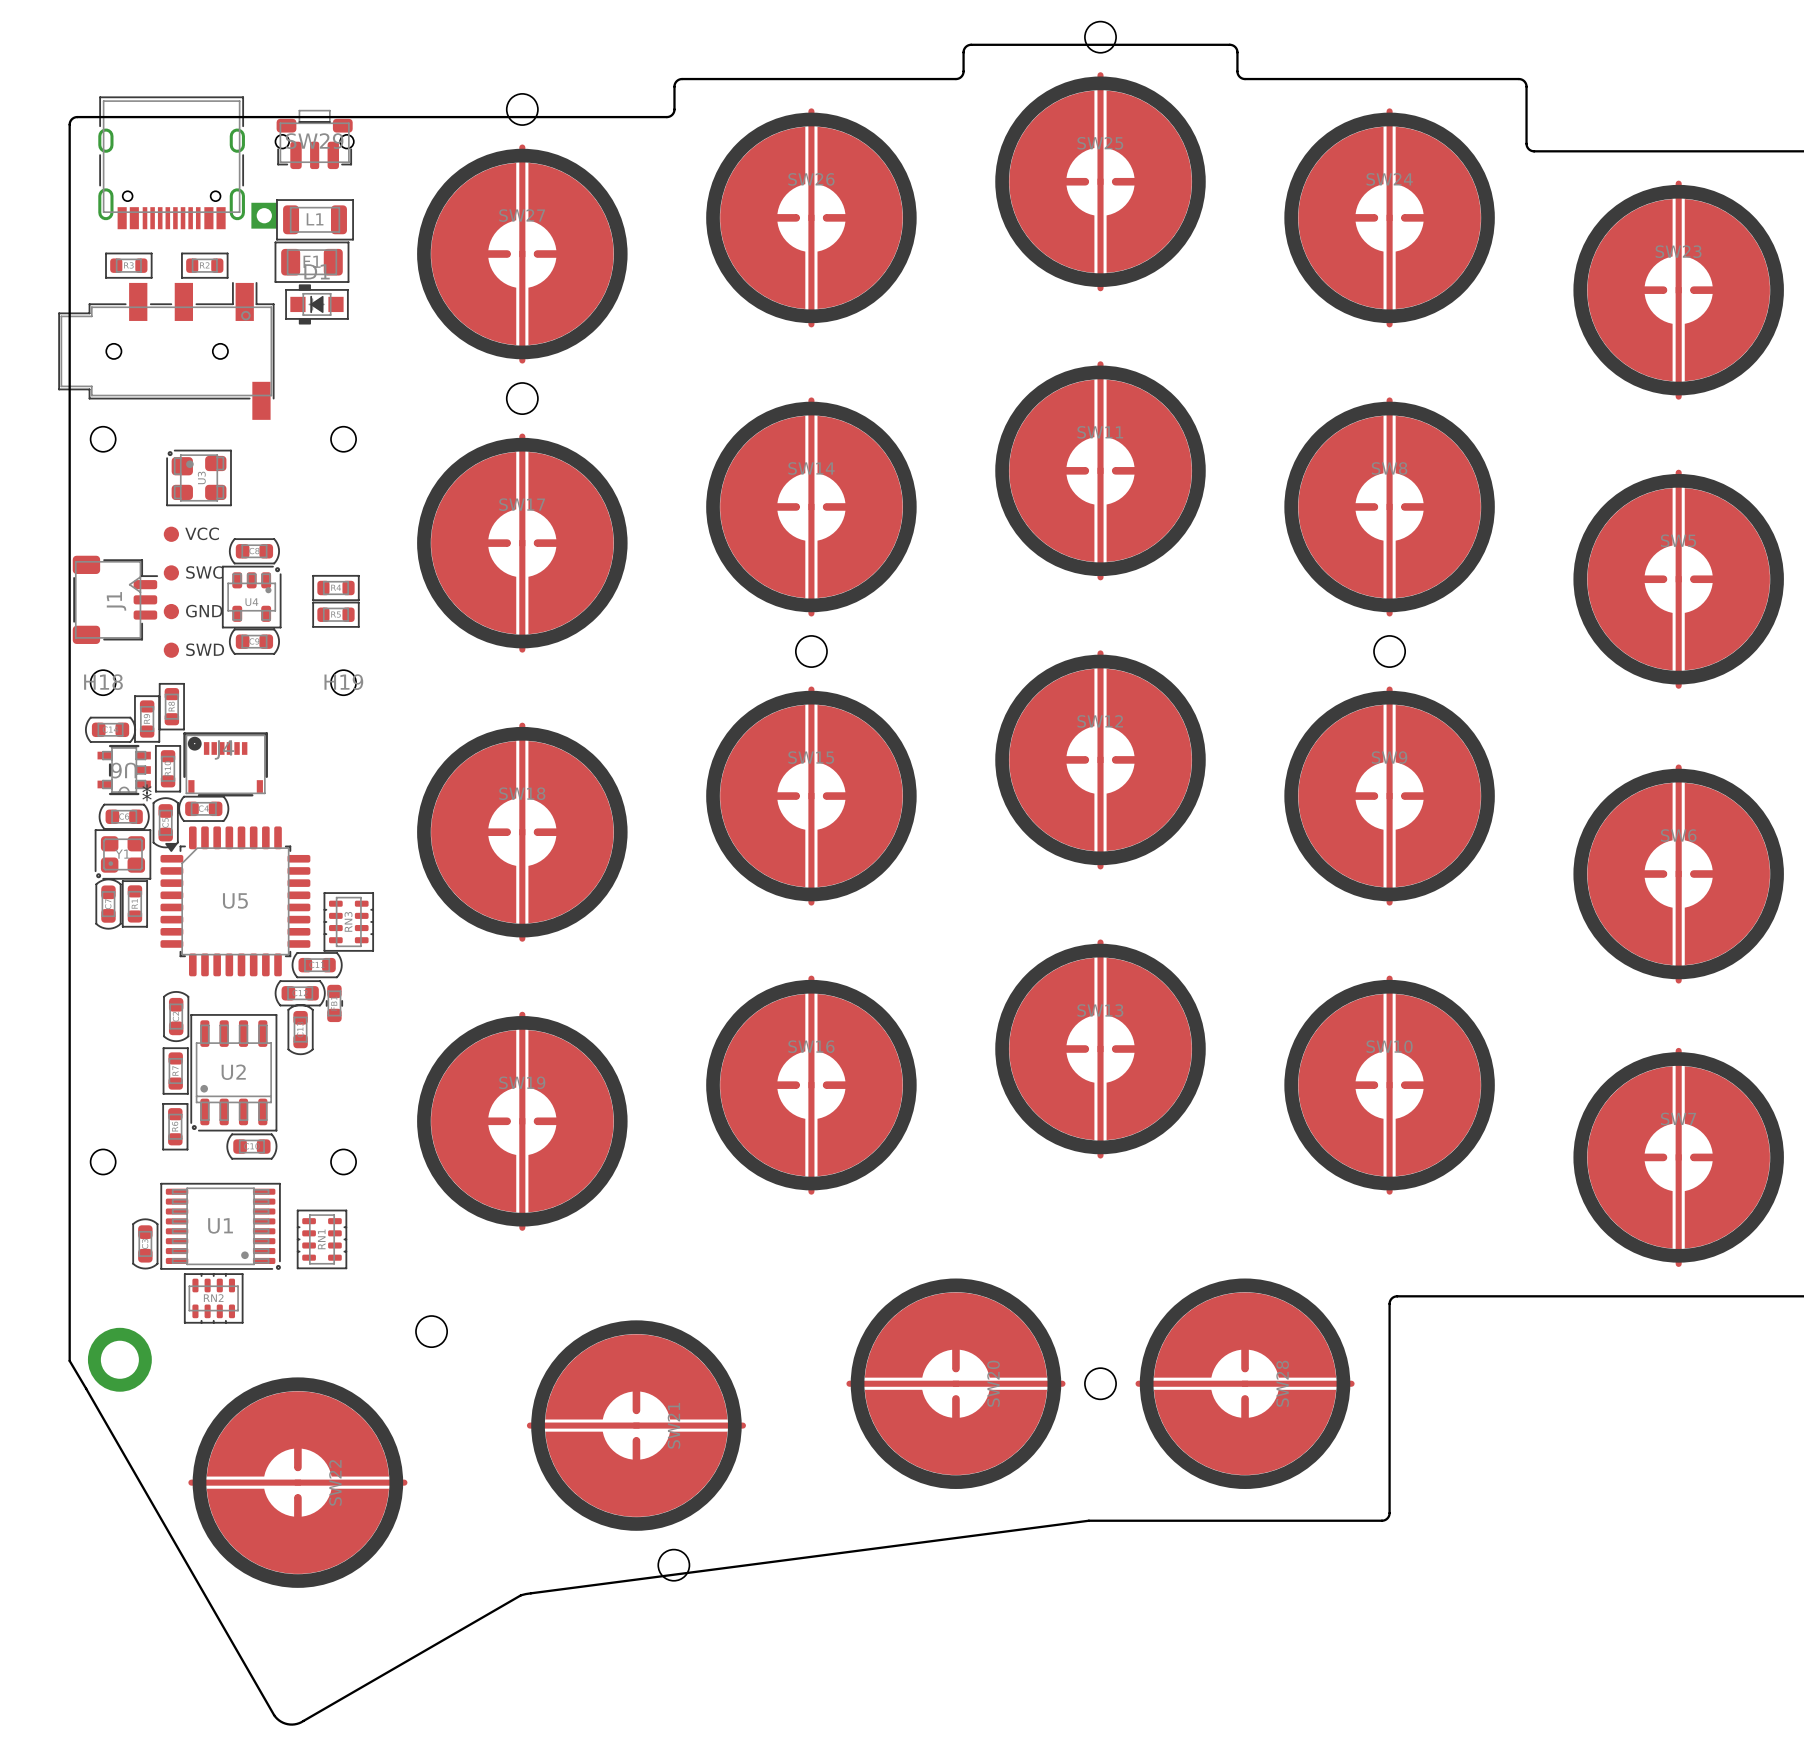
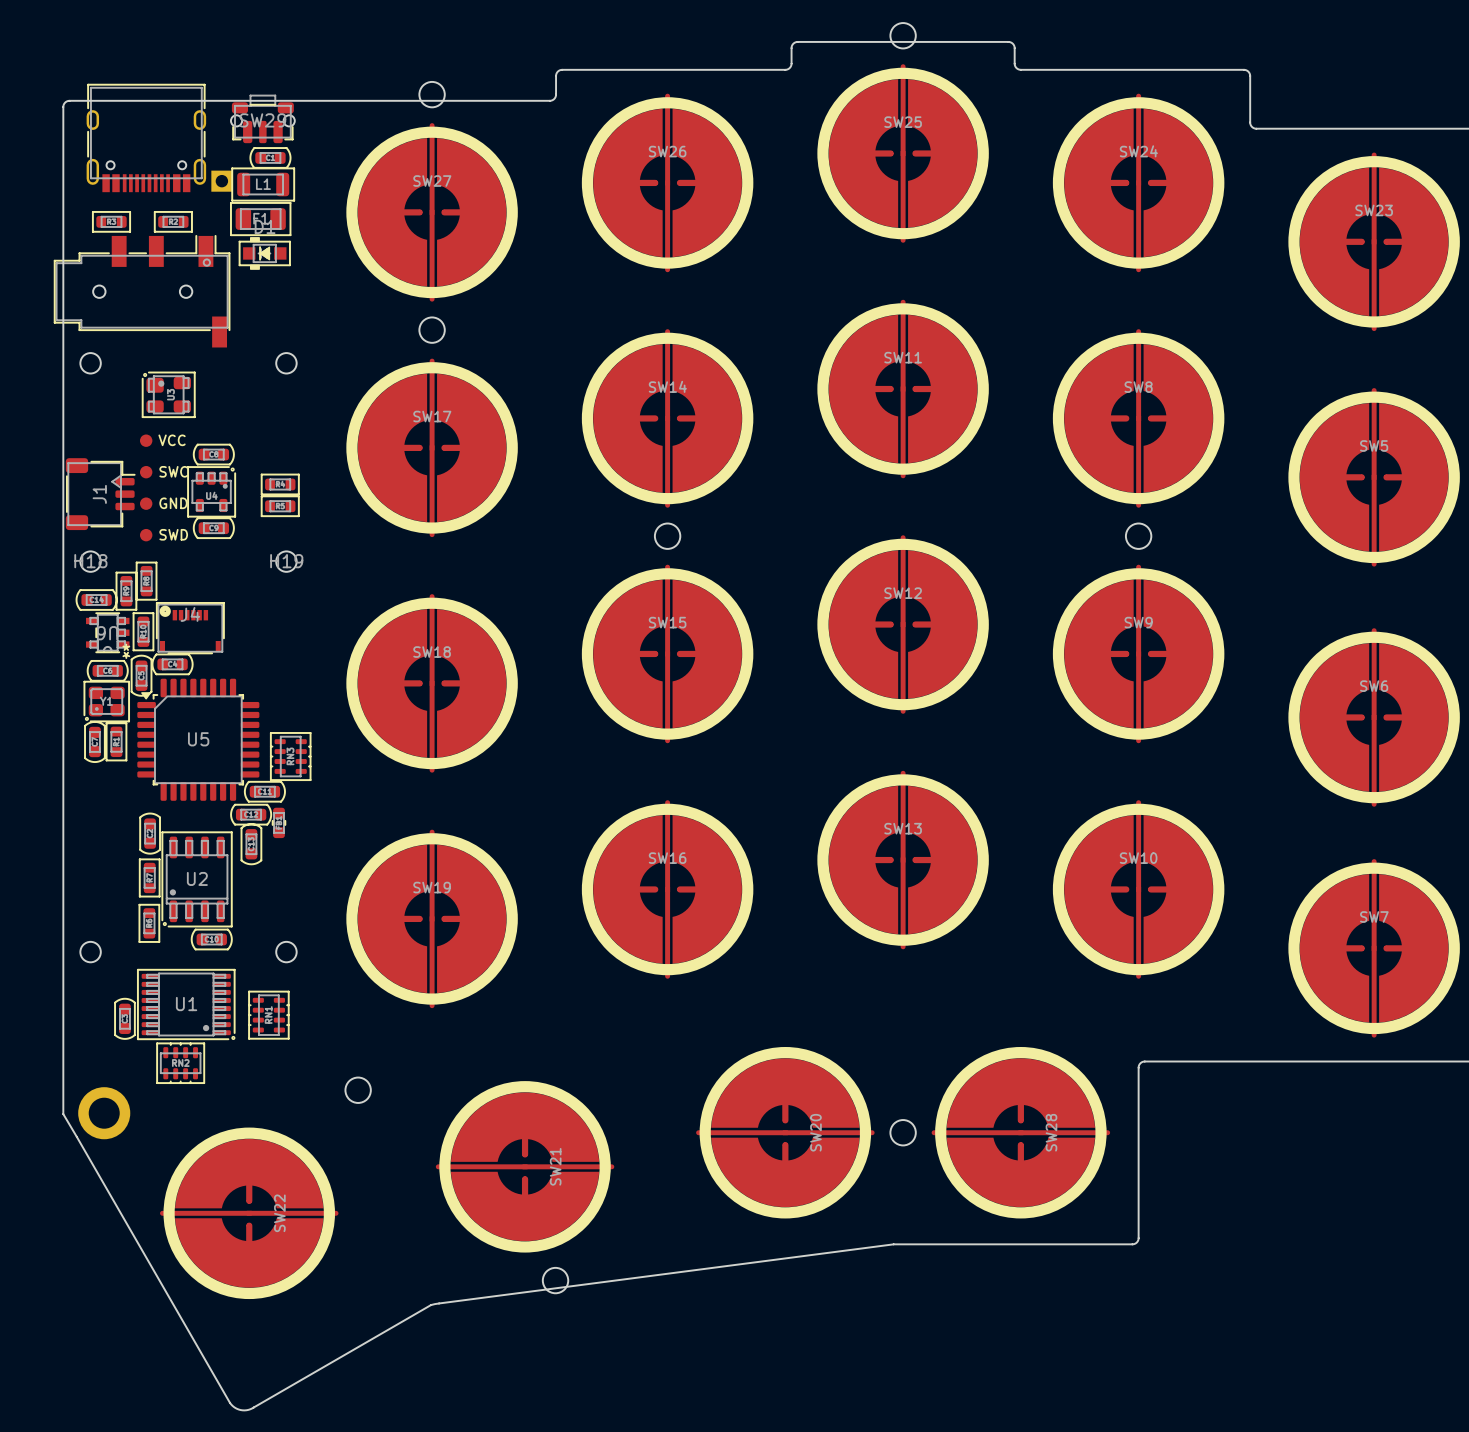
part: none -> (270, 157)

